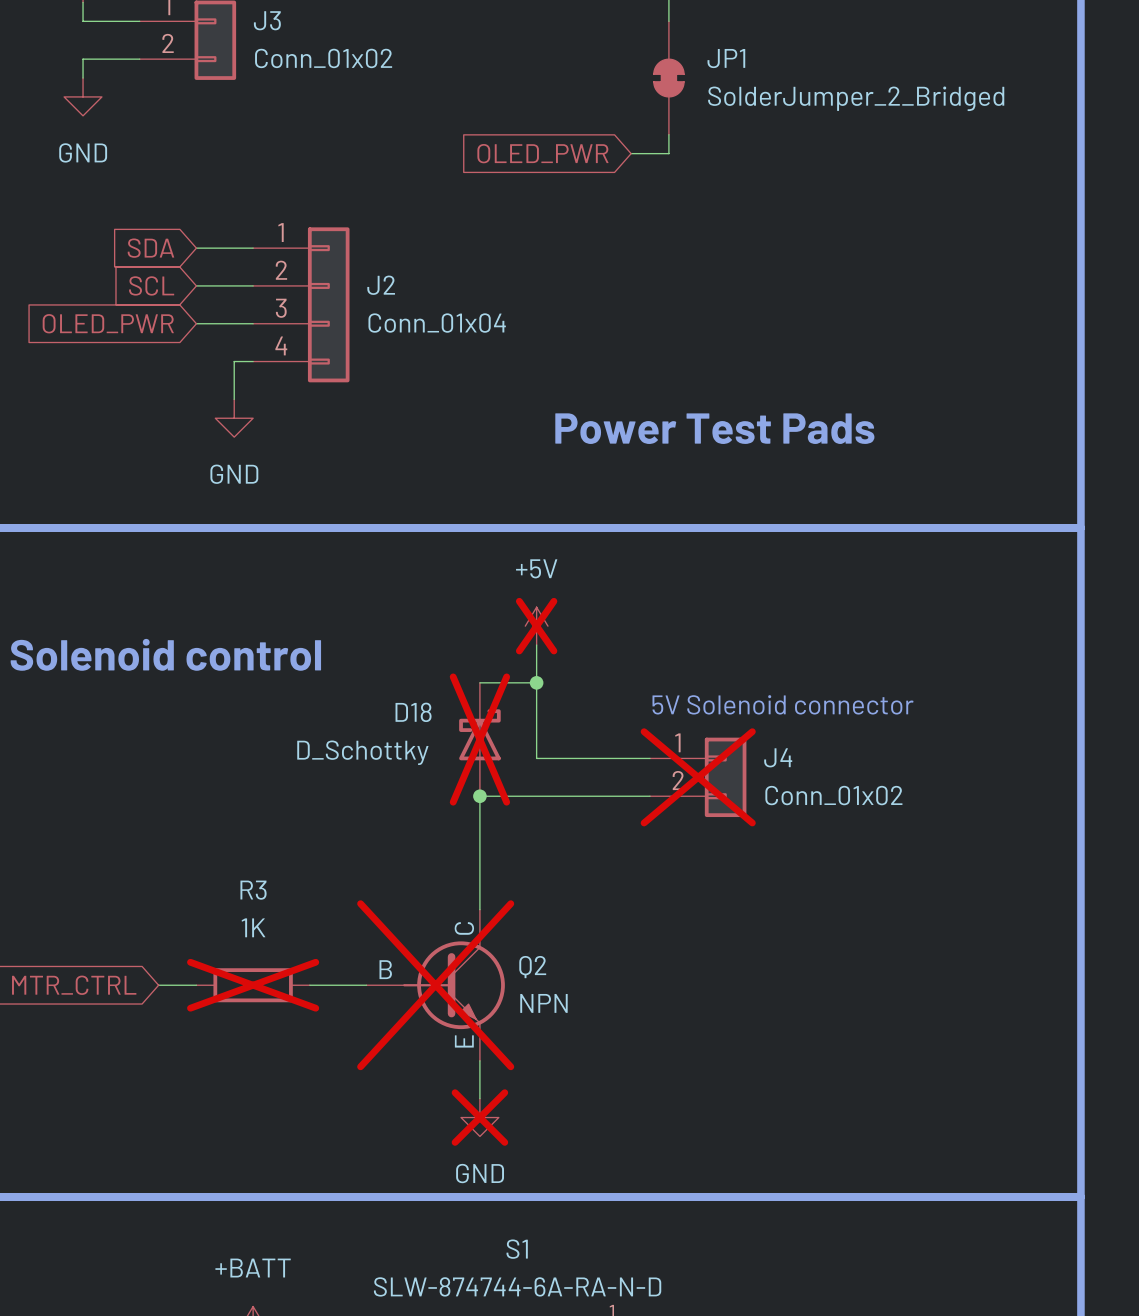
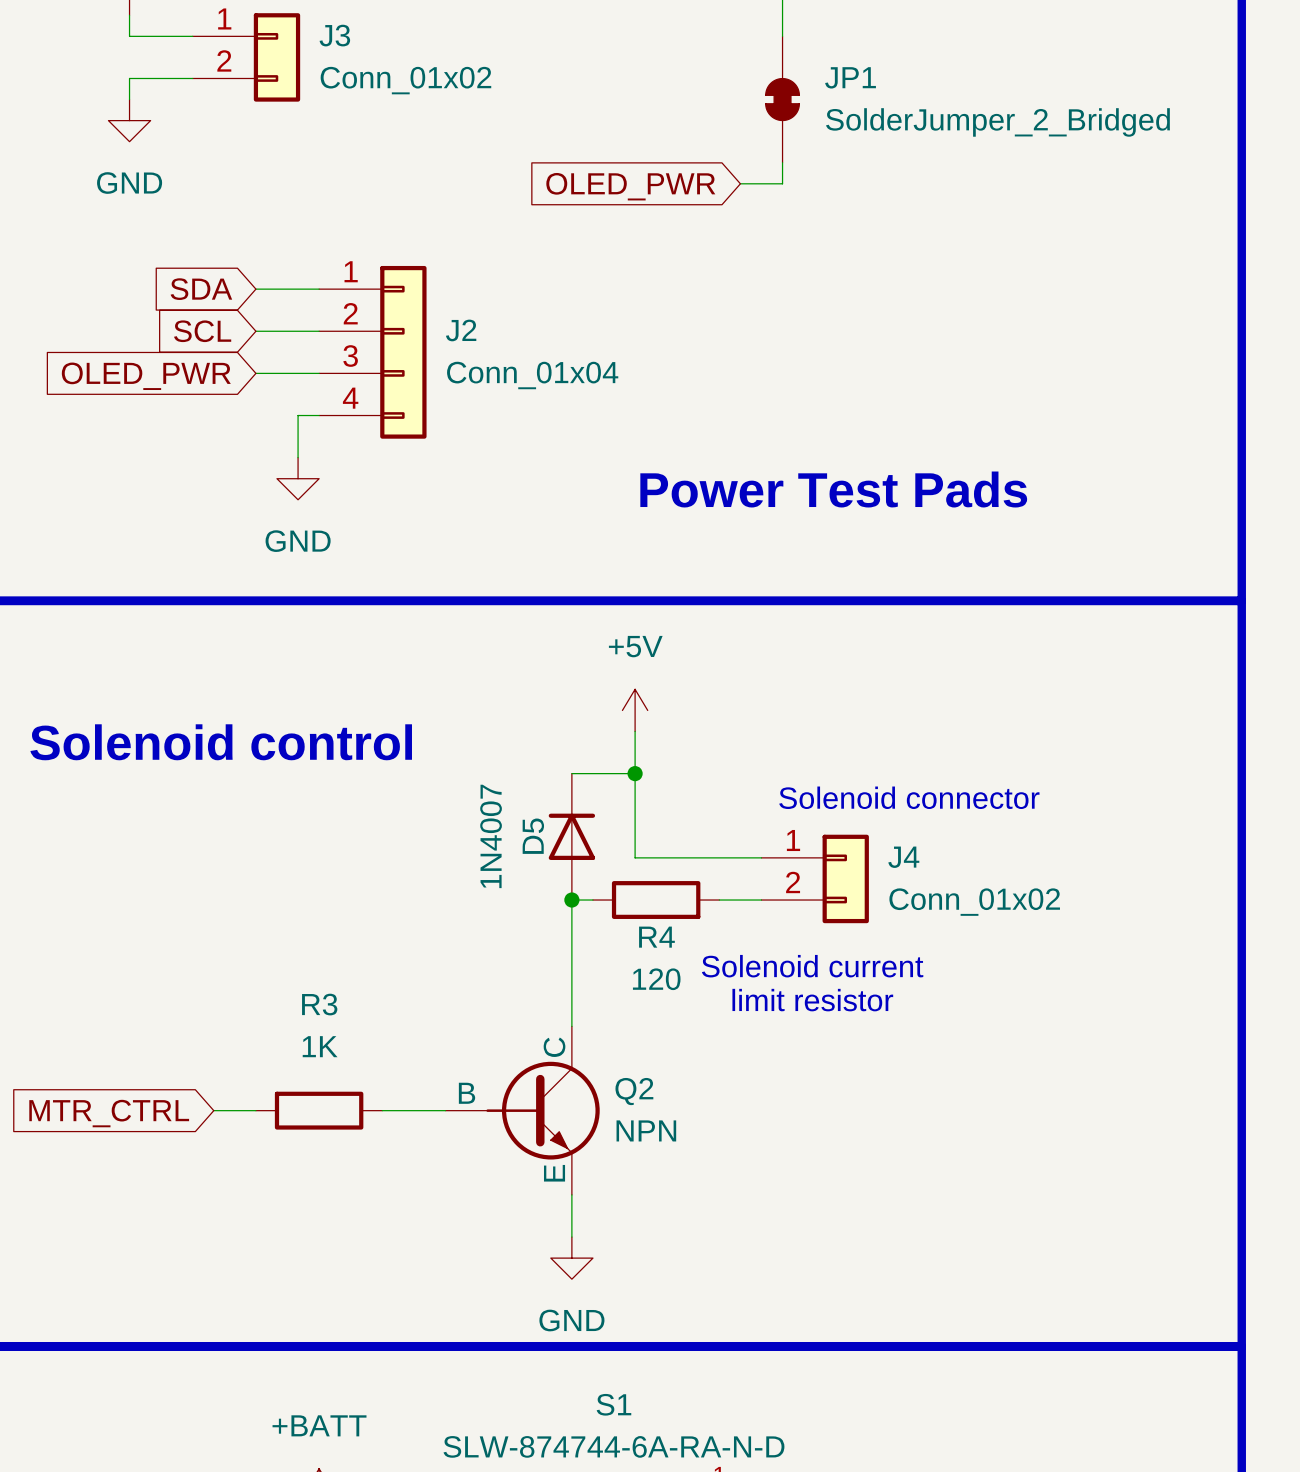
power symbol do-not-place cross: (536, 626) -> none
text: 5V Solenoid connector (783, 704) -> Solenoid connector (909, 797)
D18: D_Schottky (479, 739) -> none
D5: none -> 1N4007 (571, 836)
J4 do-not-place cross: (698, 777) -> none
wire: (498, 796) (612, 796) -> none
R4: none -> 120 (656, 900)
text: none -> Solenoid current (812, 966)
text: none -> limit resistor (812, 1000)
R3 do-not-place cross: (253, 985) -> none
Q2 do-not-place cross: (435, 985) -> none
power symbol do-not-place cross: (479, 1117) -> none

